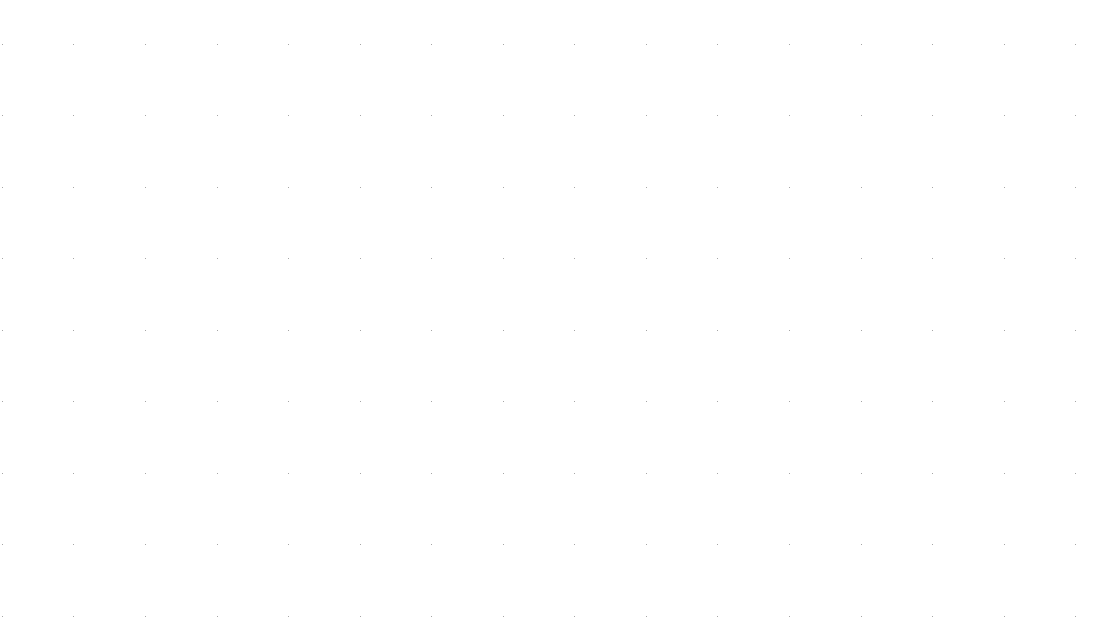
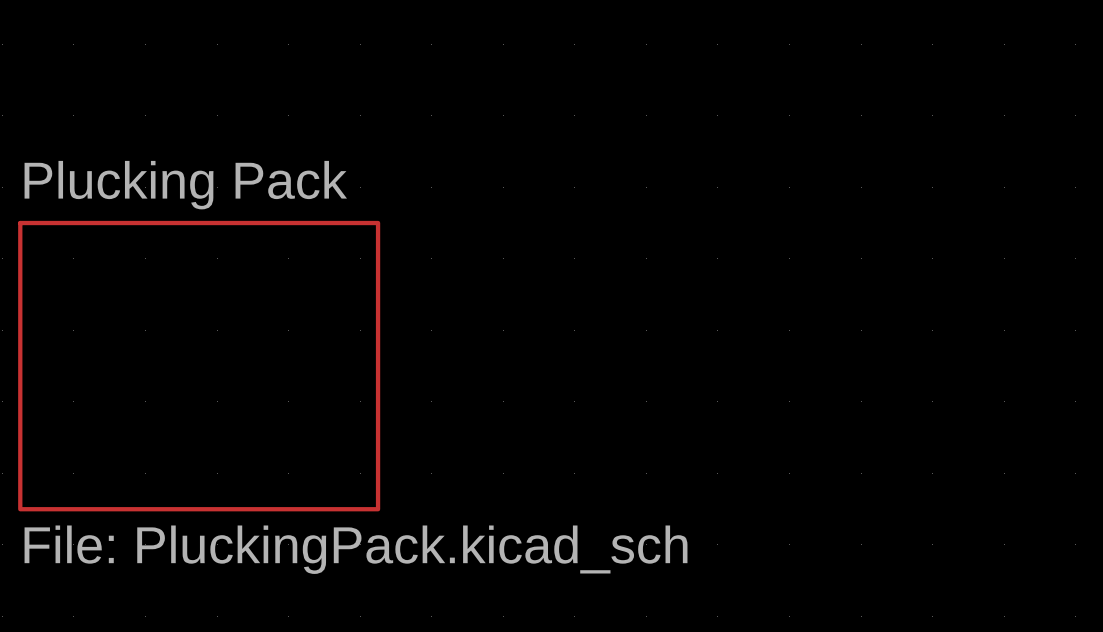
sheet Plucking Pack: none -> File: PluckingPack.kicad_sch (199, 366)

